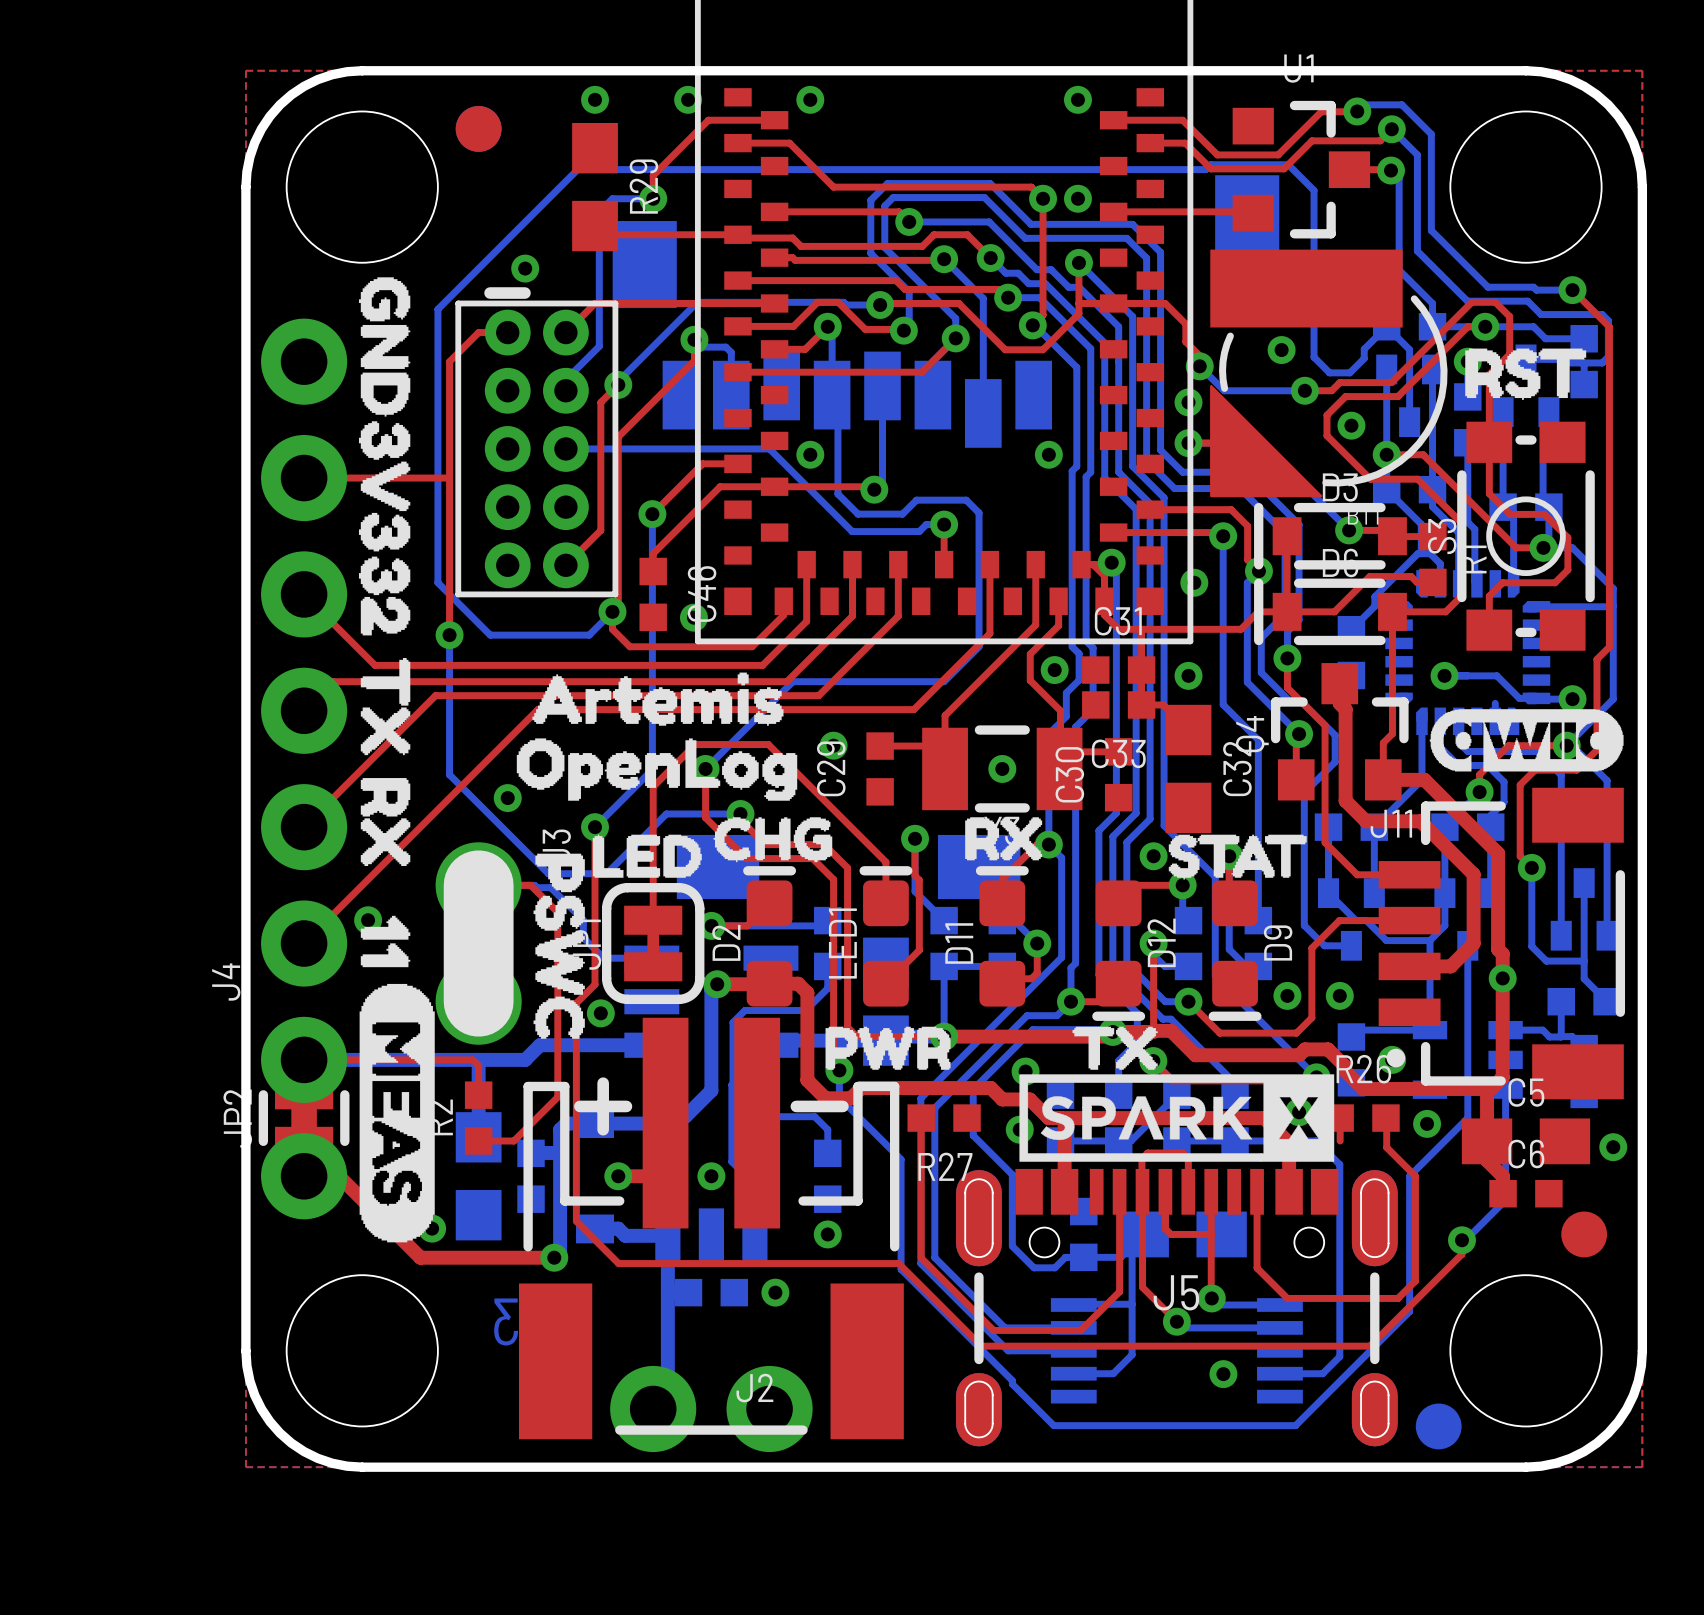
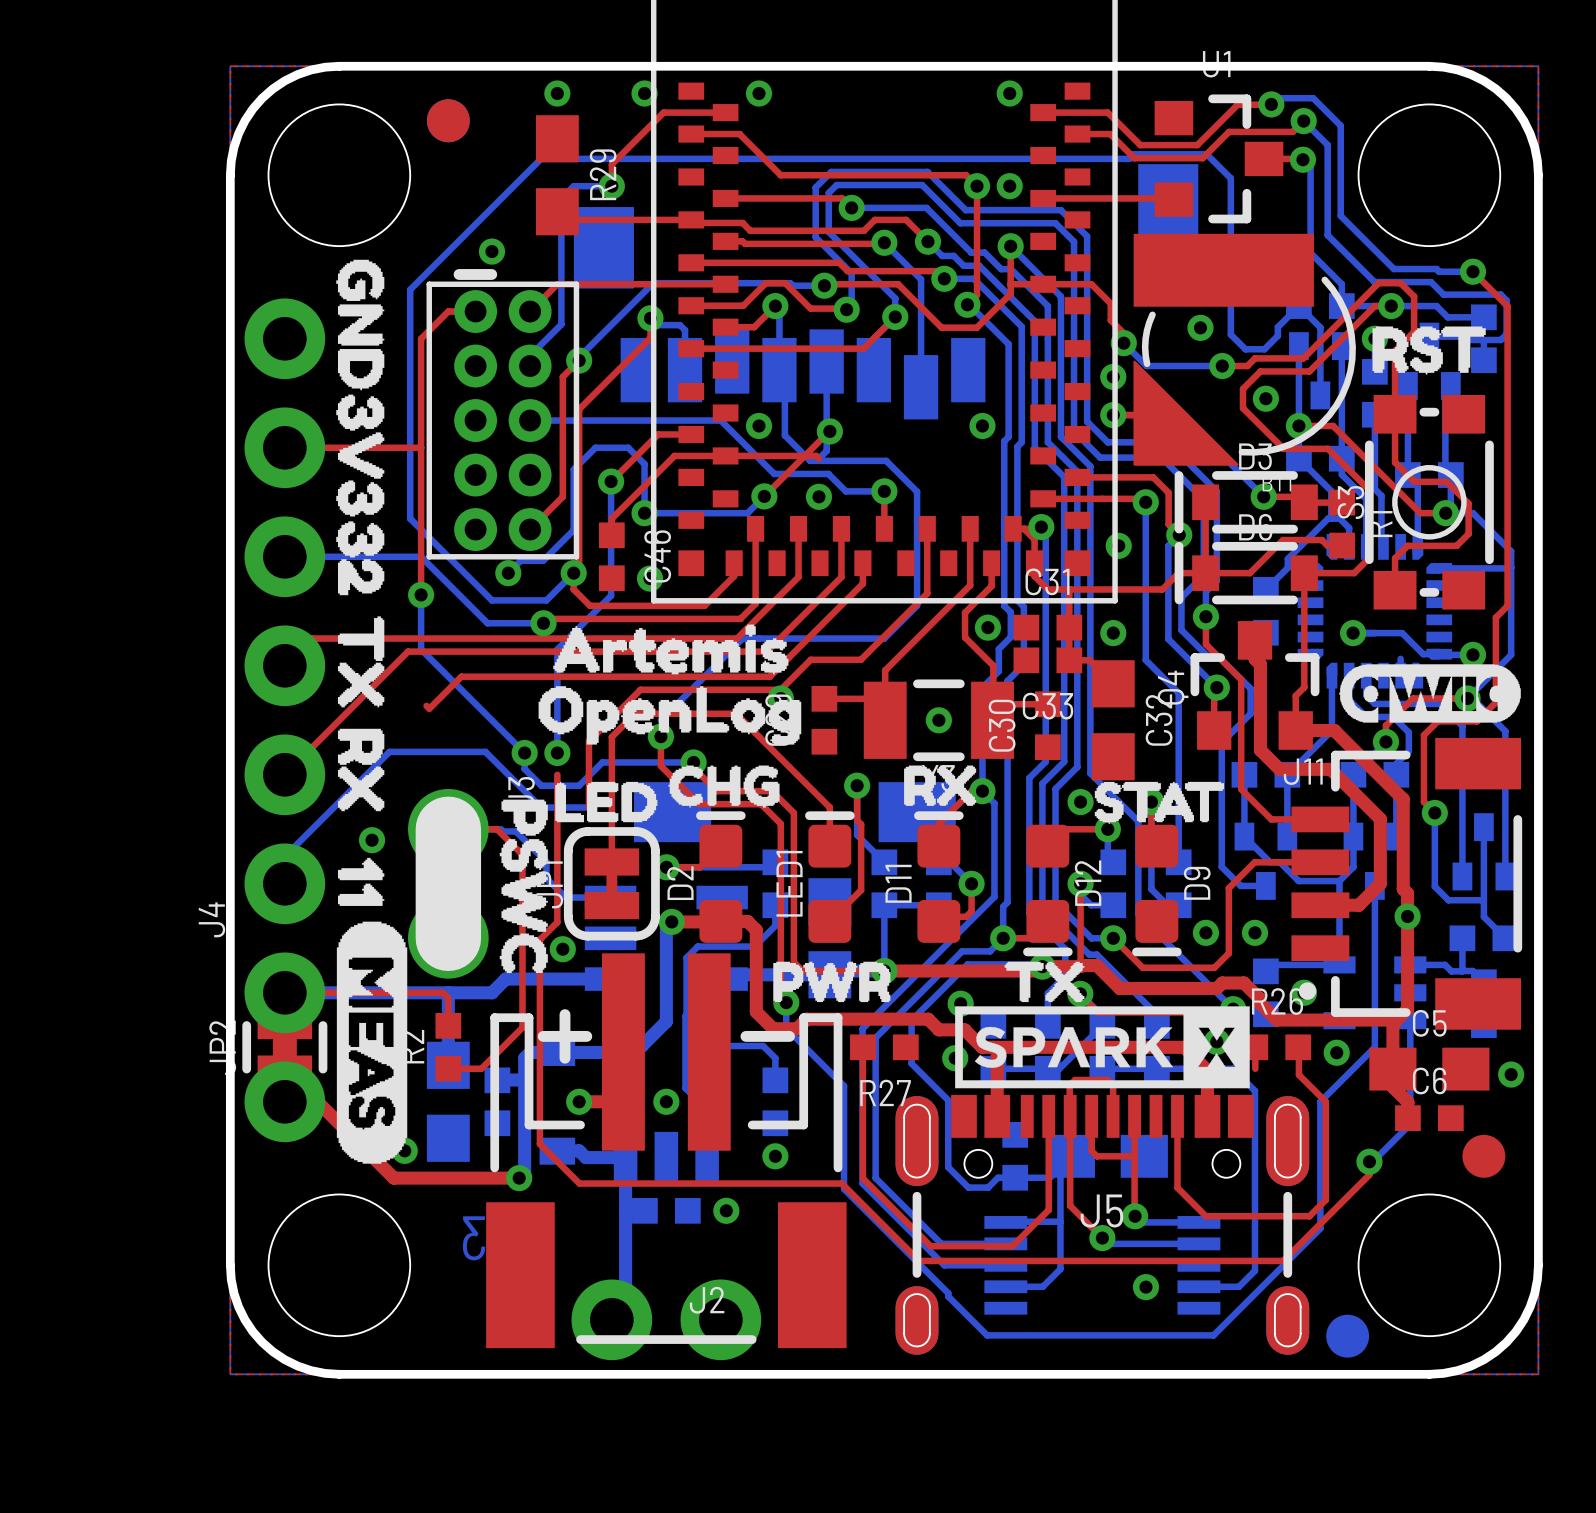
top track: none -> (829, 431) (764, 496)
via: none -> (829, 431)
bottom track: (837, 464) (837, 494) (858, 514) (902, 514) (916, 500) (966, 500) (979, 512) (979, 524) -> (784, 435) (810, 460) (886, 460) (917, 491)
via: (874, 489) -> none
bottom track: (826, 505) (852, 531) (919, 531) (926, 524) -> (774, 473) (828, 473) (845, 491) (867, 491)
bottom track: none -> (764, 496) (747, 513) (644, 513) (644, 464) (628, 447) (595, 447) (573, 469) (573, 530) (543, 560) (520, 560) (508, 573)
via: none -> (764, 496)
via: none -> (818, 496)
via: none -> (644, 513)
bottom track: (437, 553) (437, 582) (449, 594) -> (284, 556) (421, 556)
bottom track: none -> (410, 518) (491, 600) (546, 600) (551, 594)
top track: (304, 594) (375, 665) (762, 665) (806, 621) -> (543, 623) (547, 618) (740, 618) (755, 603) (755, 581)
top track: none -> (862, 563) (862, 583) (769, 676) (461, 676) (429, 708) (426, 705)
via: none -> (508, 573)
bottom track: (490, 635) (589, 635) -> (459, 594) (487, 623) (543, 623)
bottom track: (652, 635) (652, 769) (595, 827) -> (611, 595) (557, 649) (557, 752)
via: none -> (543, 623)
bottom track: (449, 693) (449, 774) (548, 873) (606, 873) (666, 813) -> (421, 649) (524, 752) (524, 769) (541, 785) (579, 785) (602, 762) (624, 762)
drawing position: (657, 699) -> (670, 649)
top track: (919, 704) (913, 709) (538, 709) (304, 943) -> (860, 659) (810, 659) (780, 689) (640, 689) (588, 741) (588, 807)
top track: (677, 761) (695, 744) (768, 744) (785, 761) -> (635, 713) (736, 713)
via position: (705, 768) -> (660, 736)
drawing position: (657, 769) -> (669, 715)
via: (507, 798) -> none
via: none -> (524, 752)
via position: (595, 827) -> (557, 752)
bottom track: none -> (588, 807) (541, 807) (485, 751) (389, 751) (284, 856) (284, 883)
via position: (368, 920) -> (372, 840)

